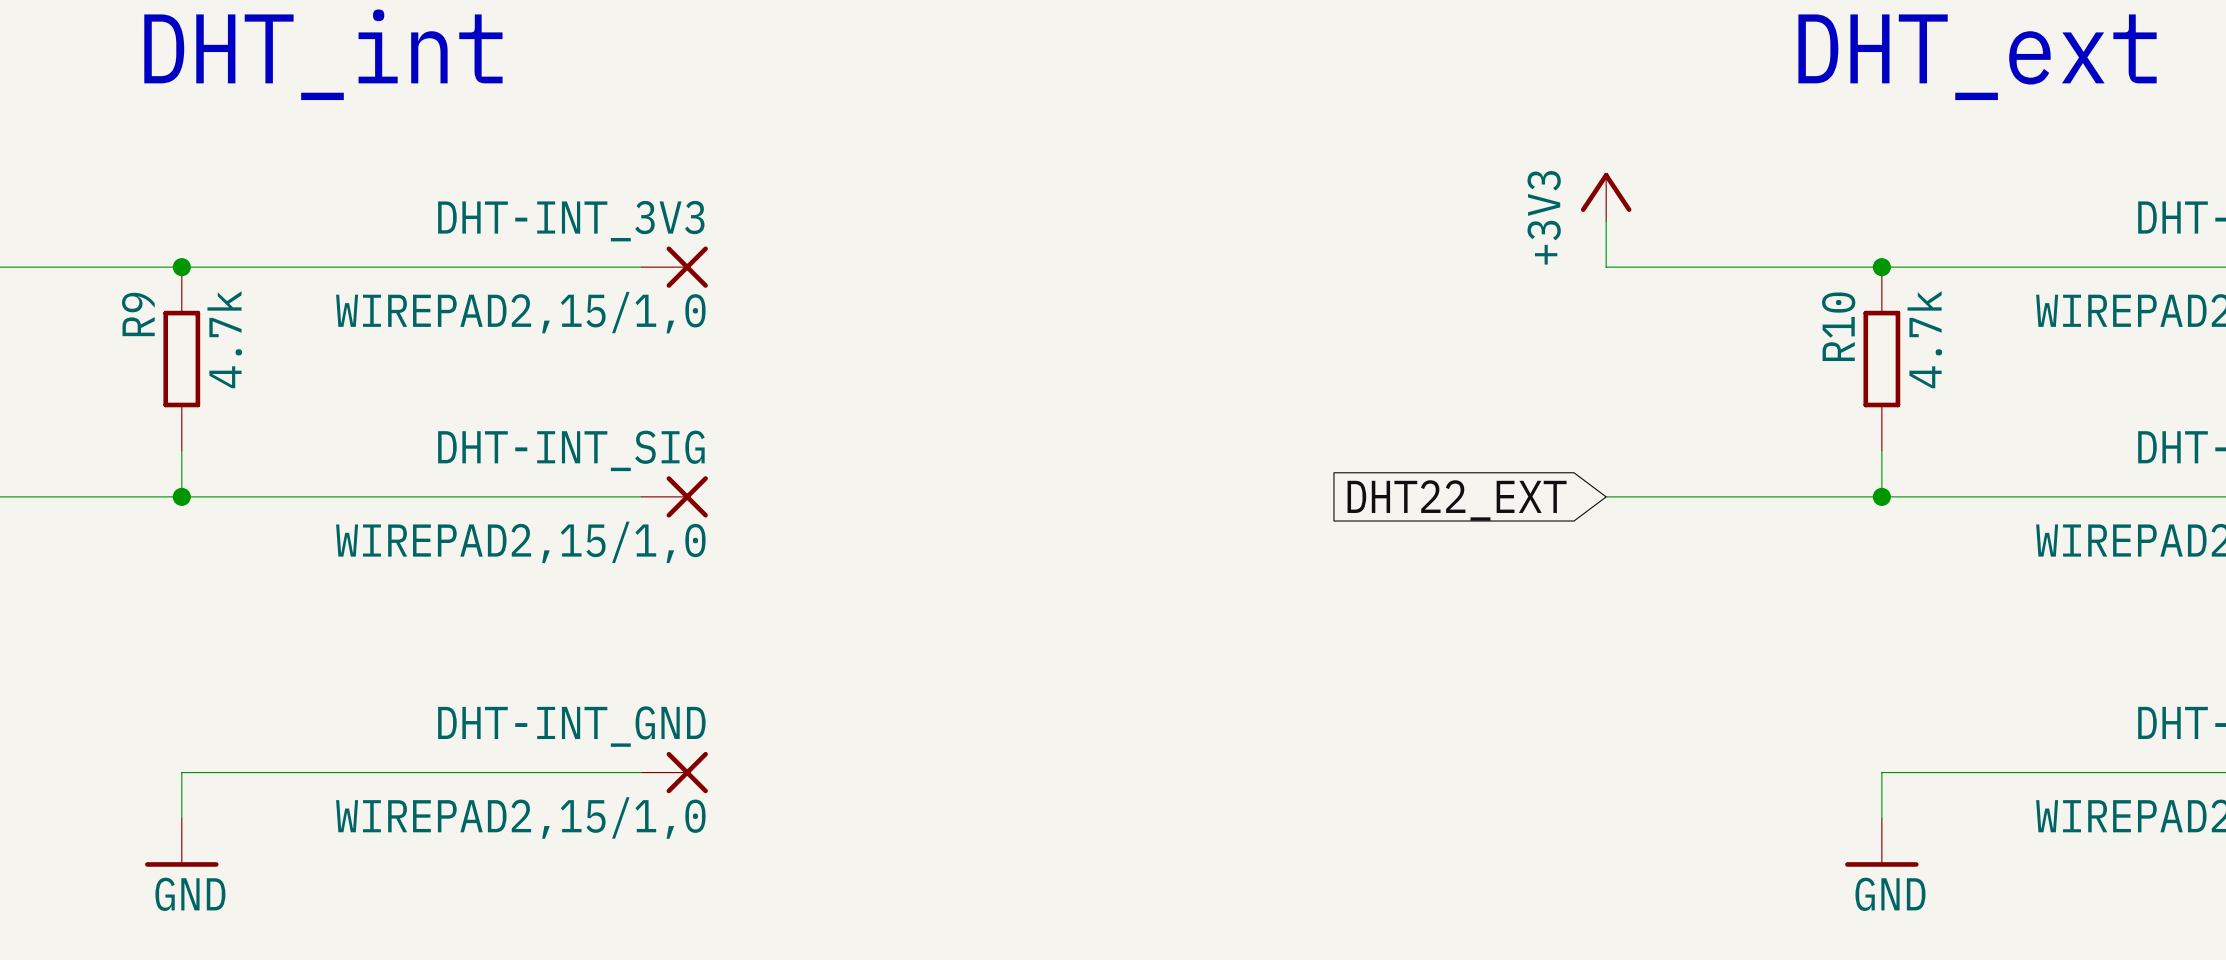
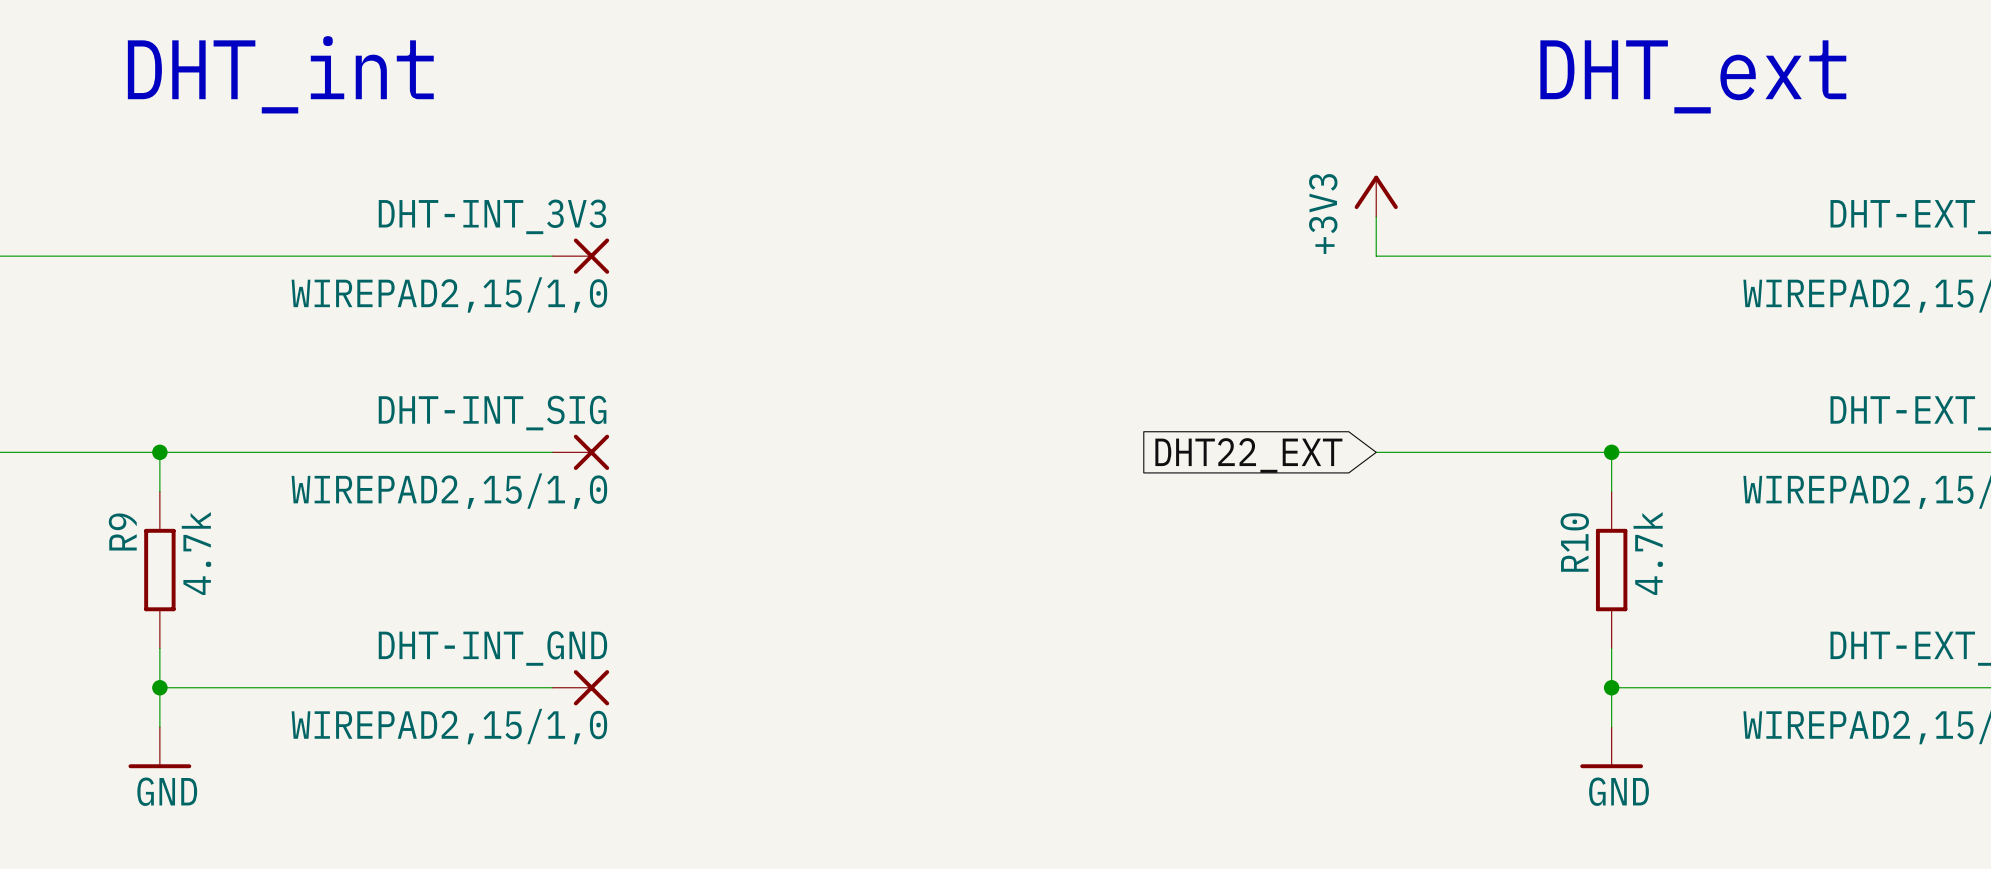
junction: (181, 267) -> none
junction: (1881, 267) -> none
R9 position: (181, 359) -> (159, 570)
R10 position: (1881, 359) -> (1611, 570)
wire: (181, 450) (181, 496) -> (159, 491) (159, 452)
wire: (1881, 450) (1881, 496) -> (1611, 491) (1611, 452)
wire: none -> (159, 648) (159, 687)
wire: none -> (1611, 648) (1611, 687)
junction: none -> (159, 687)
junction: none -> (1611, 687)

